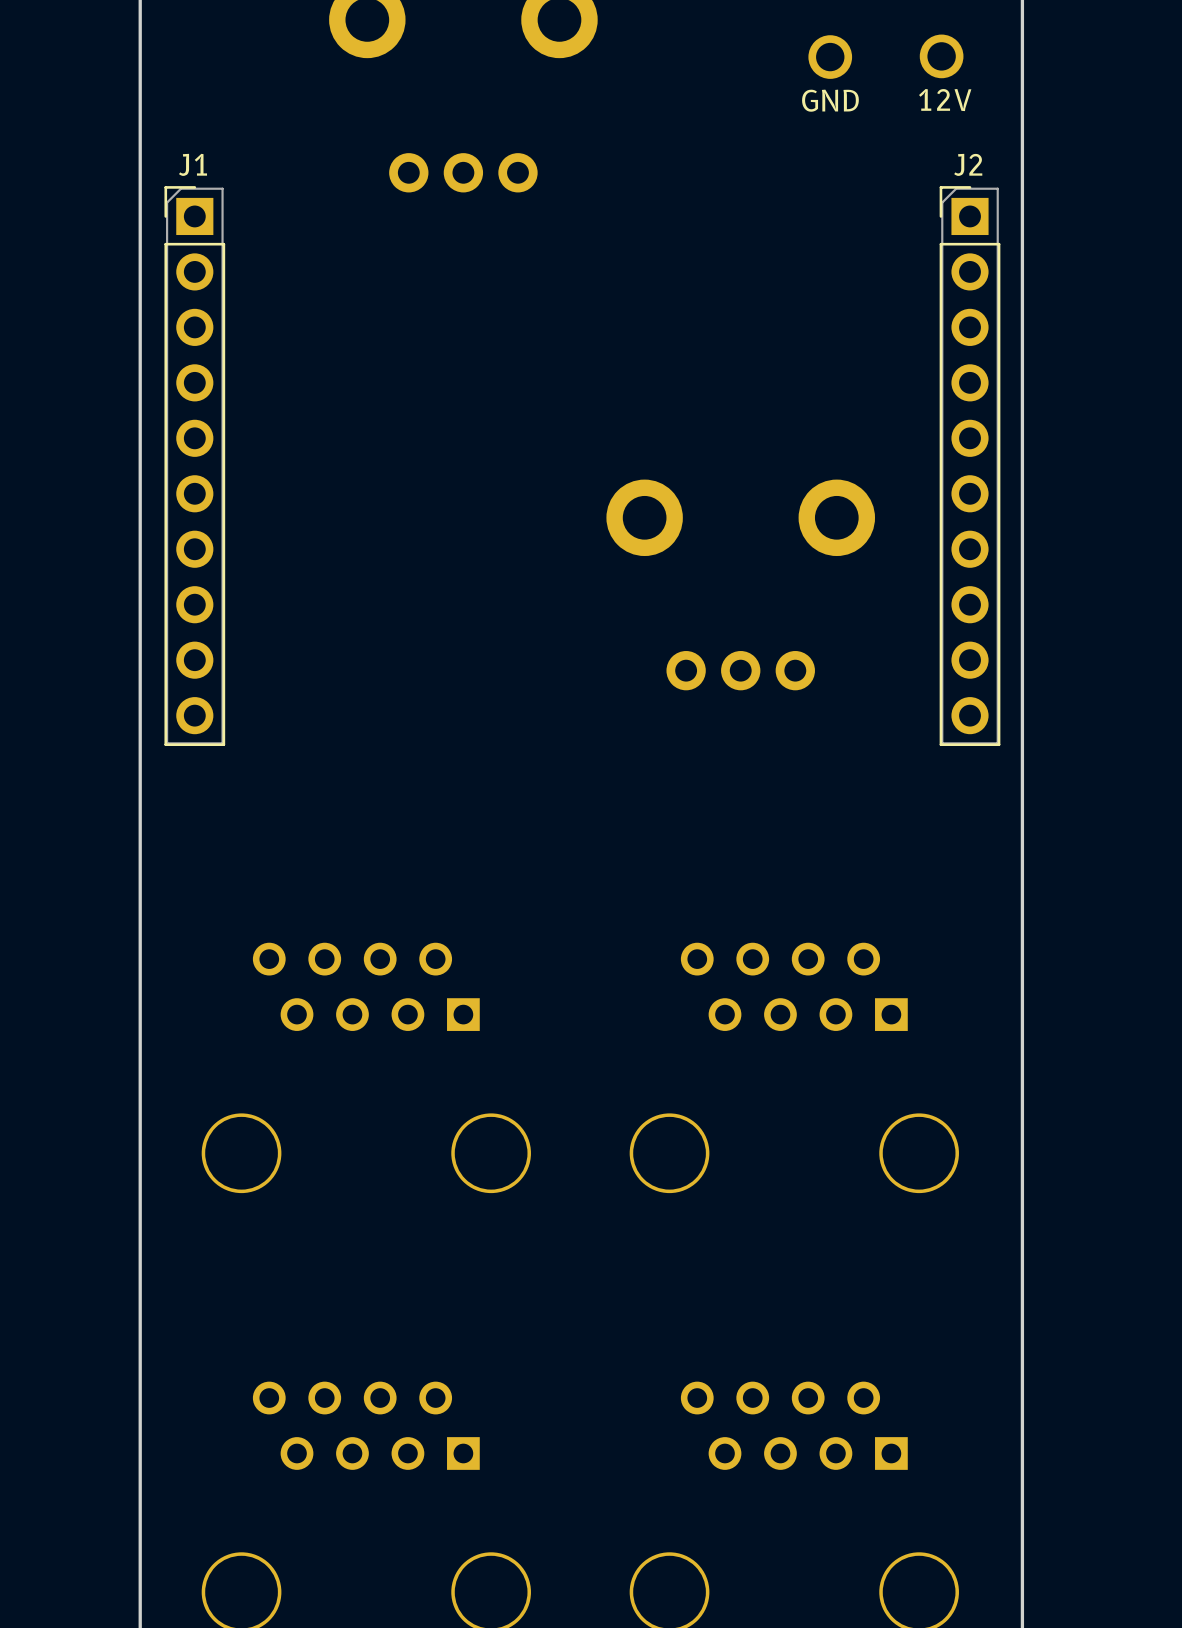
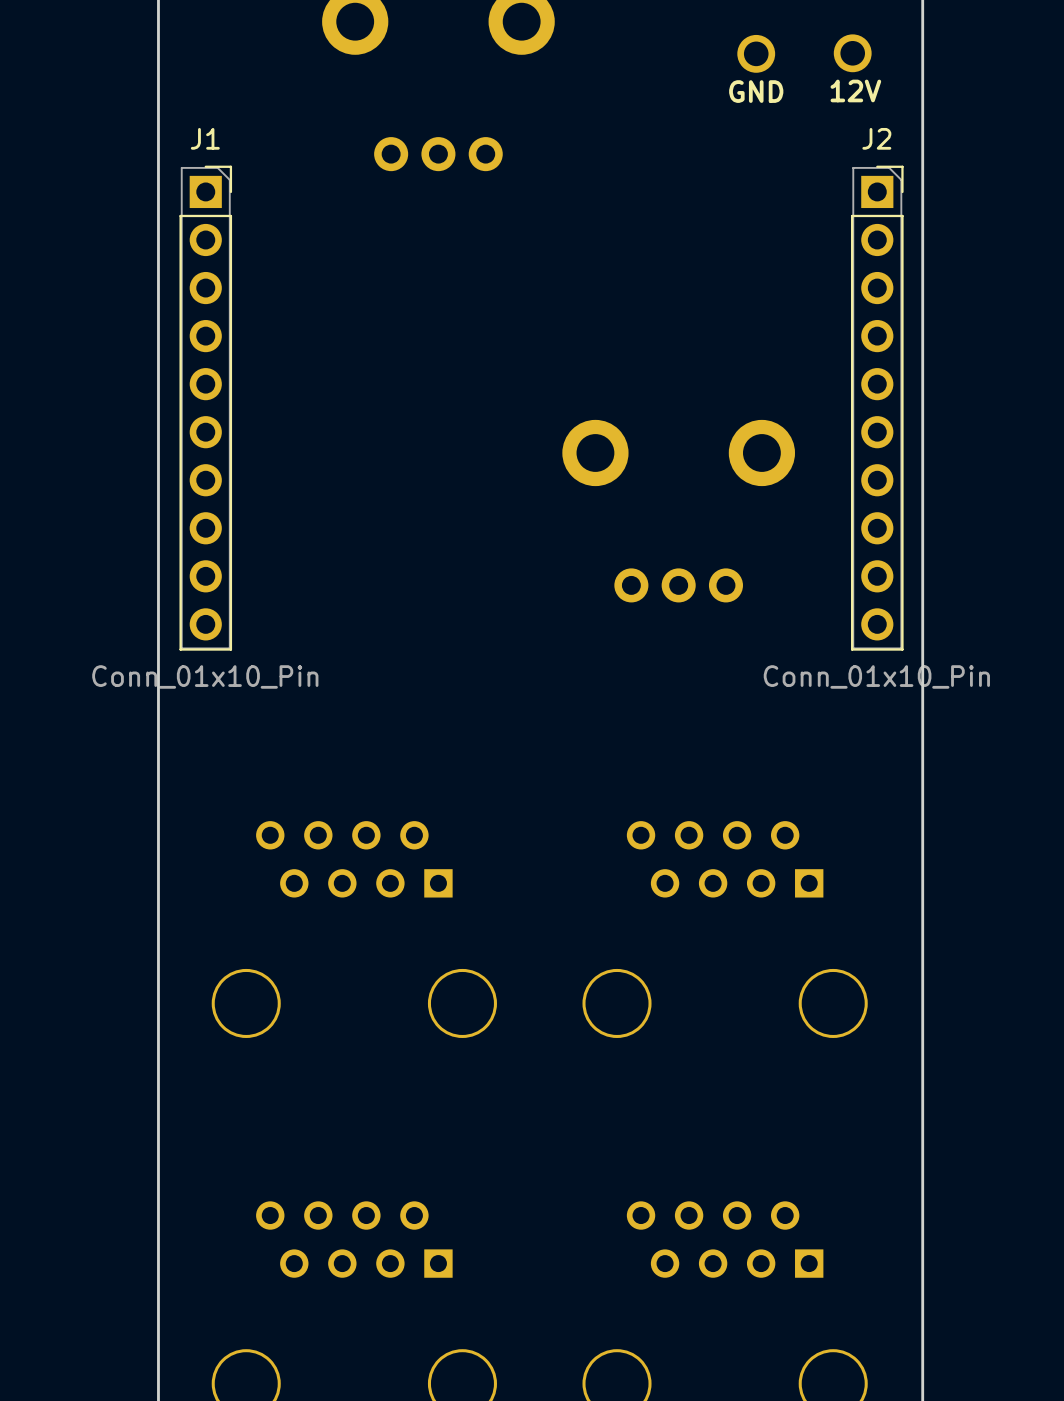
J1 footprint: [164, 186, 226, 746] -> [179, 165, 233, 651]
J2 footprint: [939, 186, 1001, 746] -> [851, 165, 904, 651]
J1 value: none -> Conn_01x10_Pin (205, 676)
J2 value: none -> Conn_01x10_Pin (876, 676)

